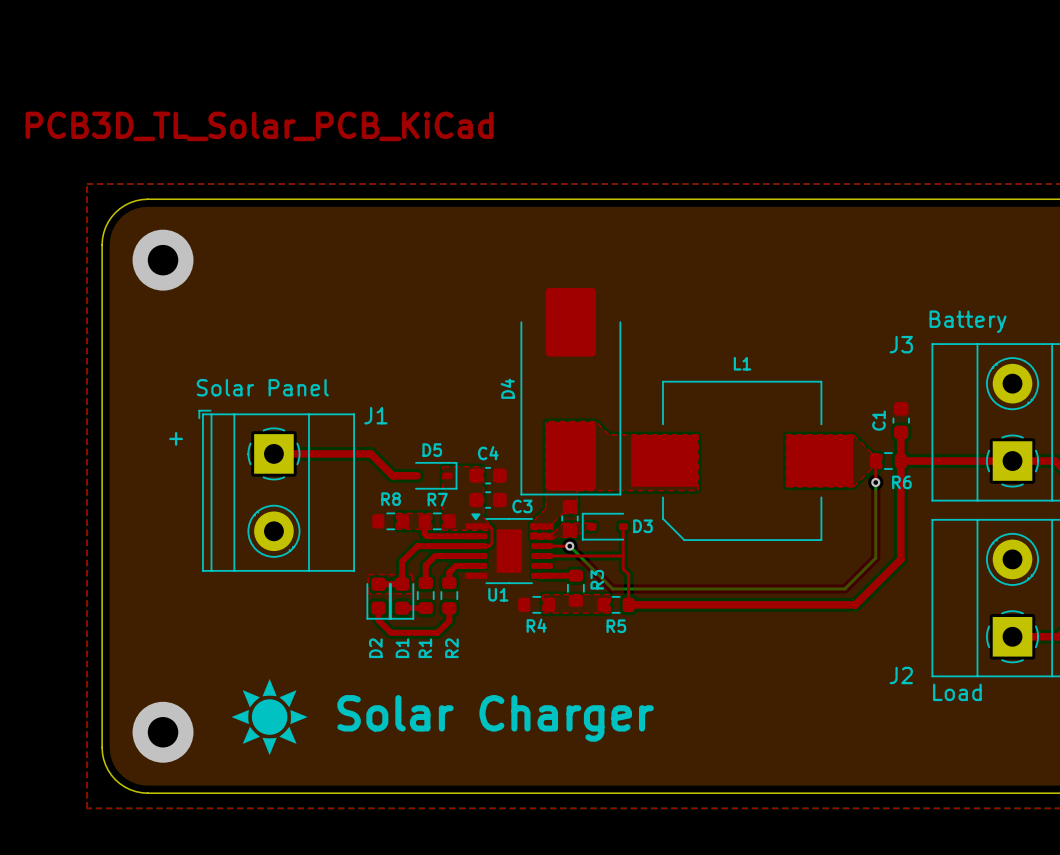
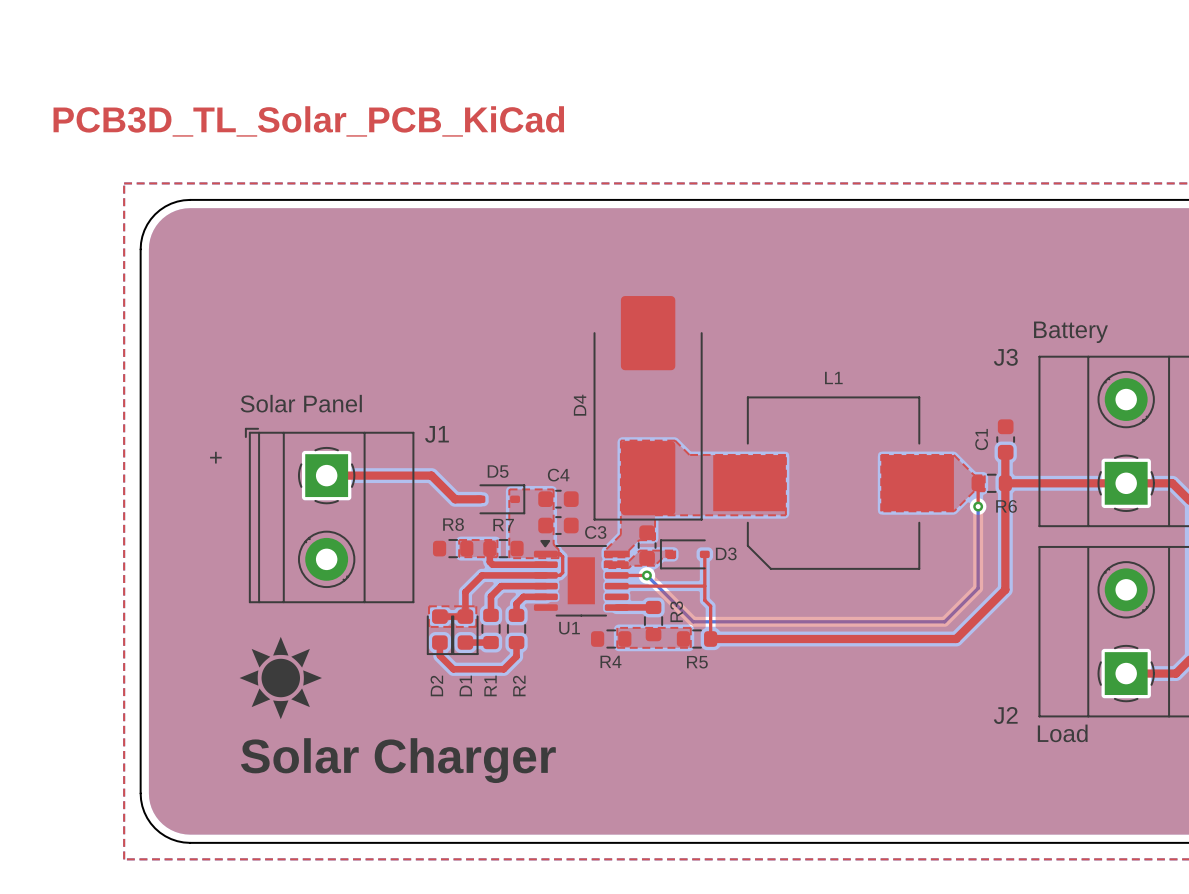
via: (163, 260) -> none
drawing position: (269, 717) -> (280, 678)
text position: Solar Charger (495, 718) -> Solar Charger (398, 760)
via: (163, 732) -> none

